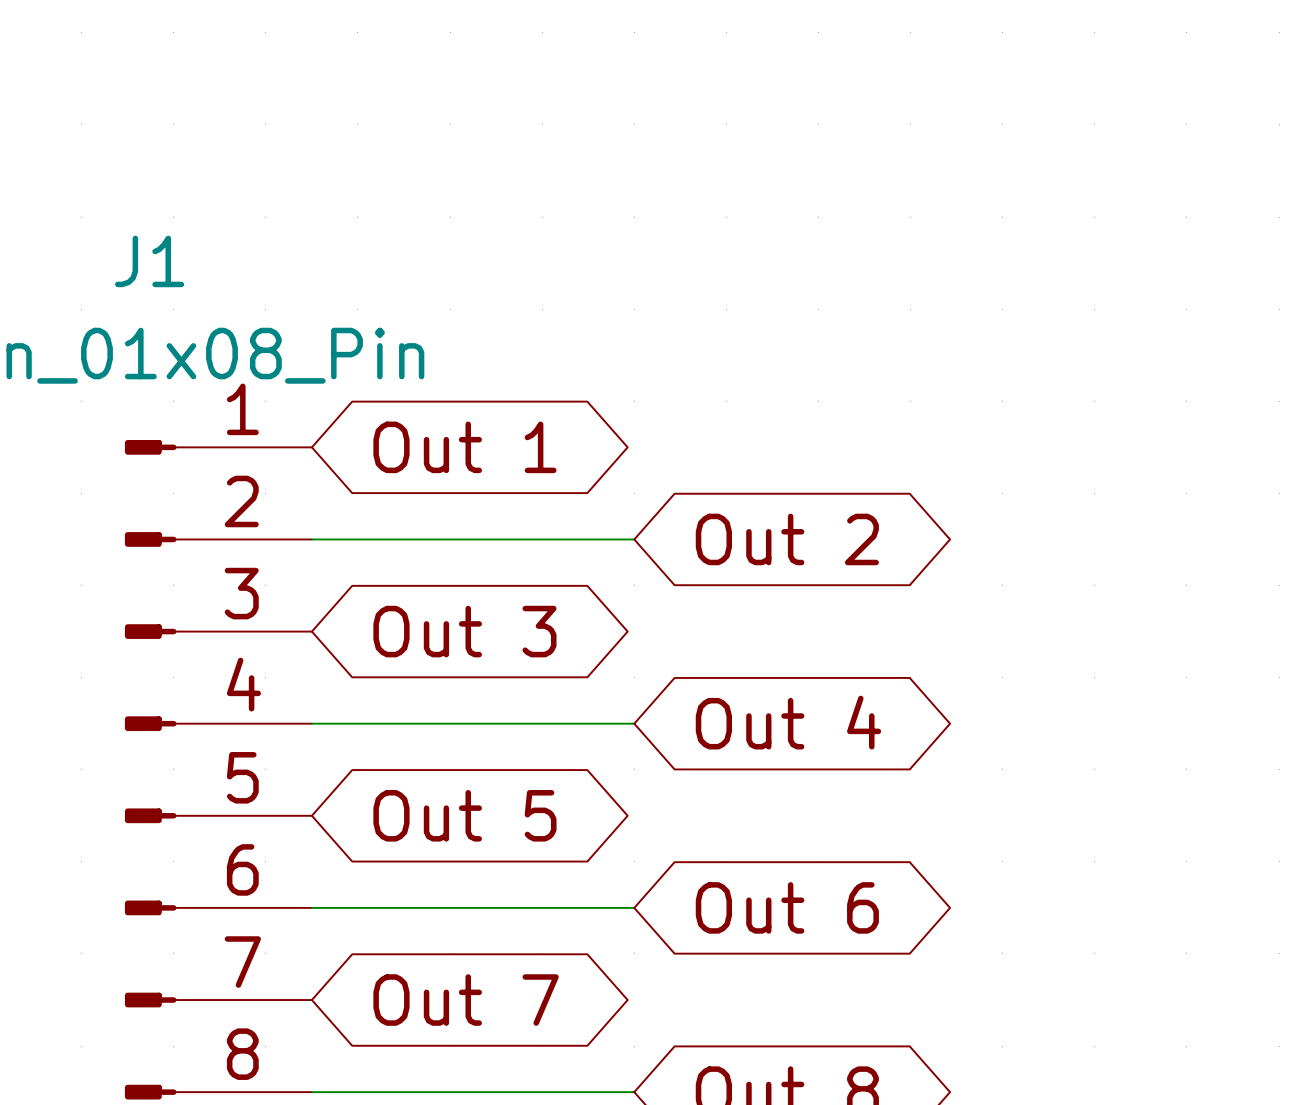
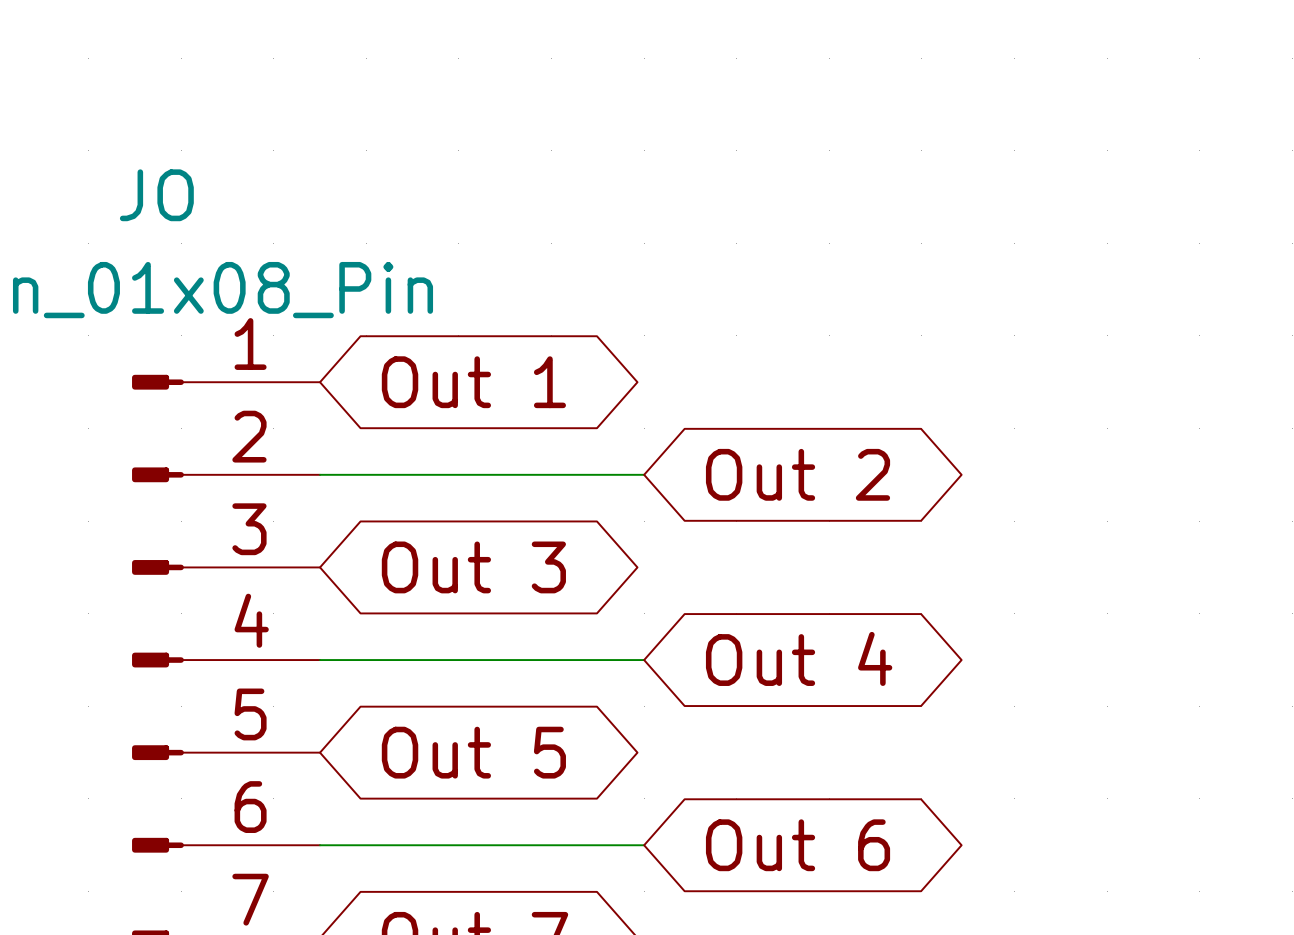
J1 name: J1 (149, 261) -> JO (156, 195)

